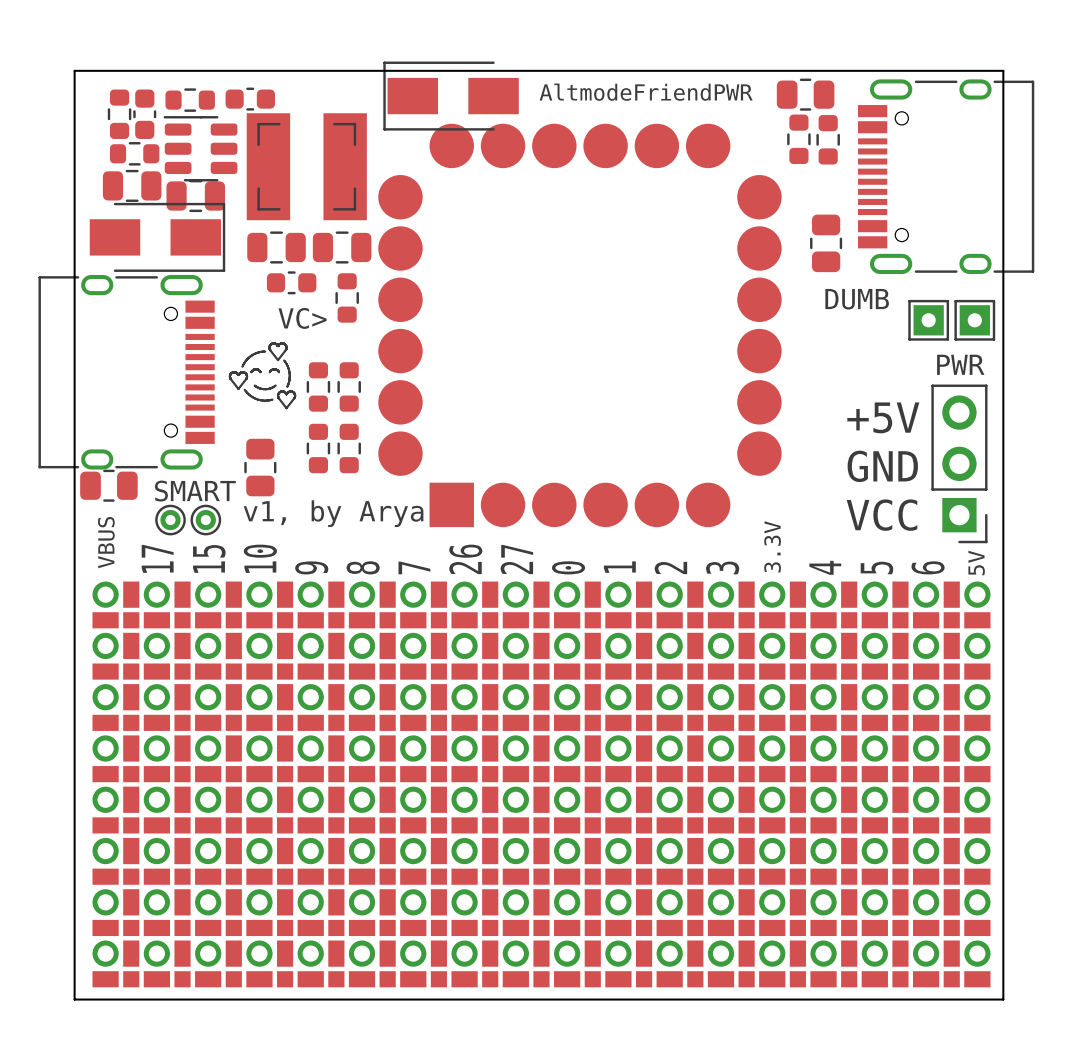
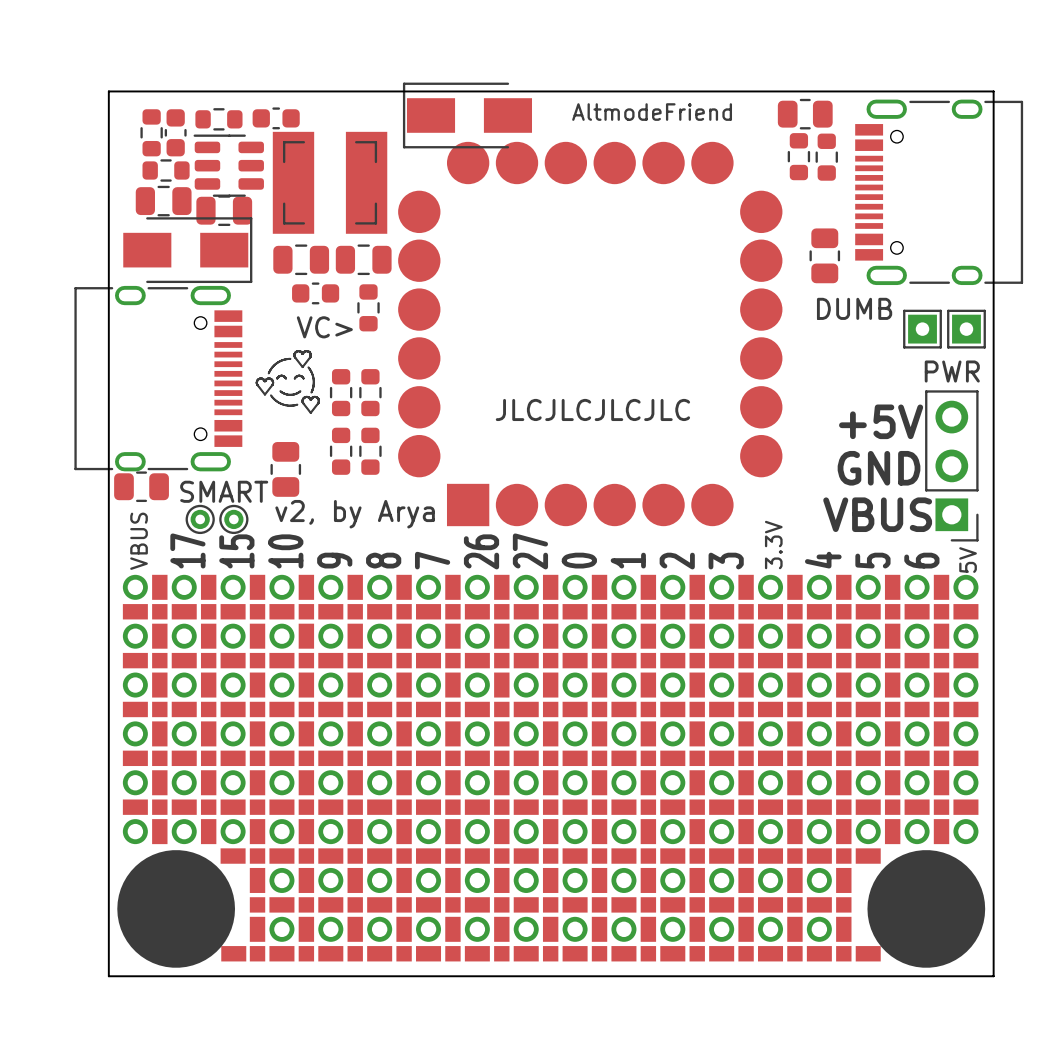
part value: AltmodeFriendPWR (646, 92) -> AltmodeFriend (652, 112)
text: none -> JLCJLCJLCJLC (592, 409)
text: v1, by Arya (333, 513) -> v2, by Arya (355, 514)
text: VCC (881, 515) -> VBUS (877, 514)
part footprint: [92, 581, 991, 988] -> [122, 574, 979, 962]
part: none -> (176, 908)
part: none -> (926, 908)

